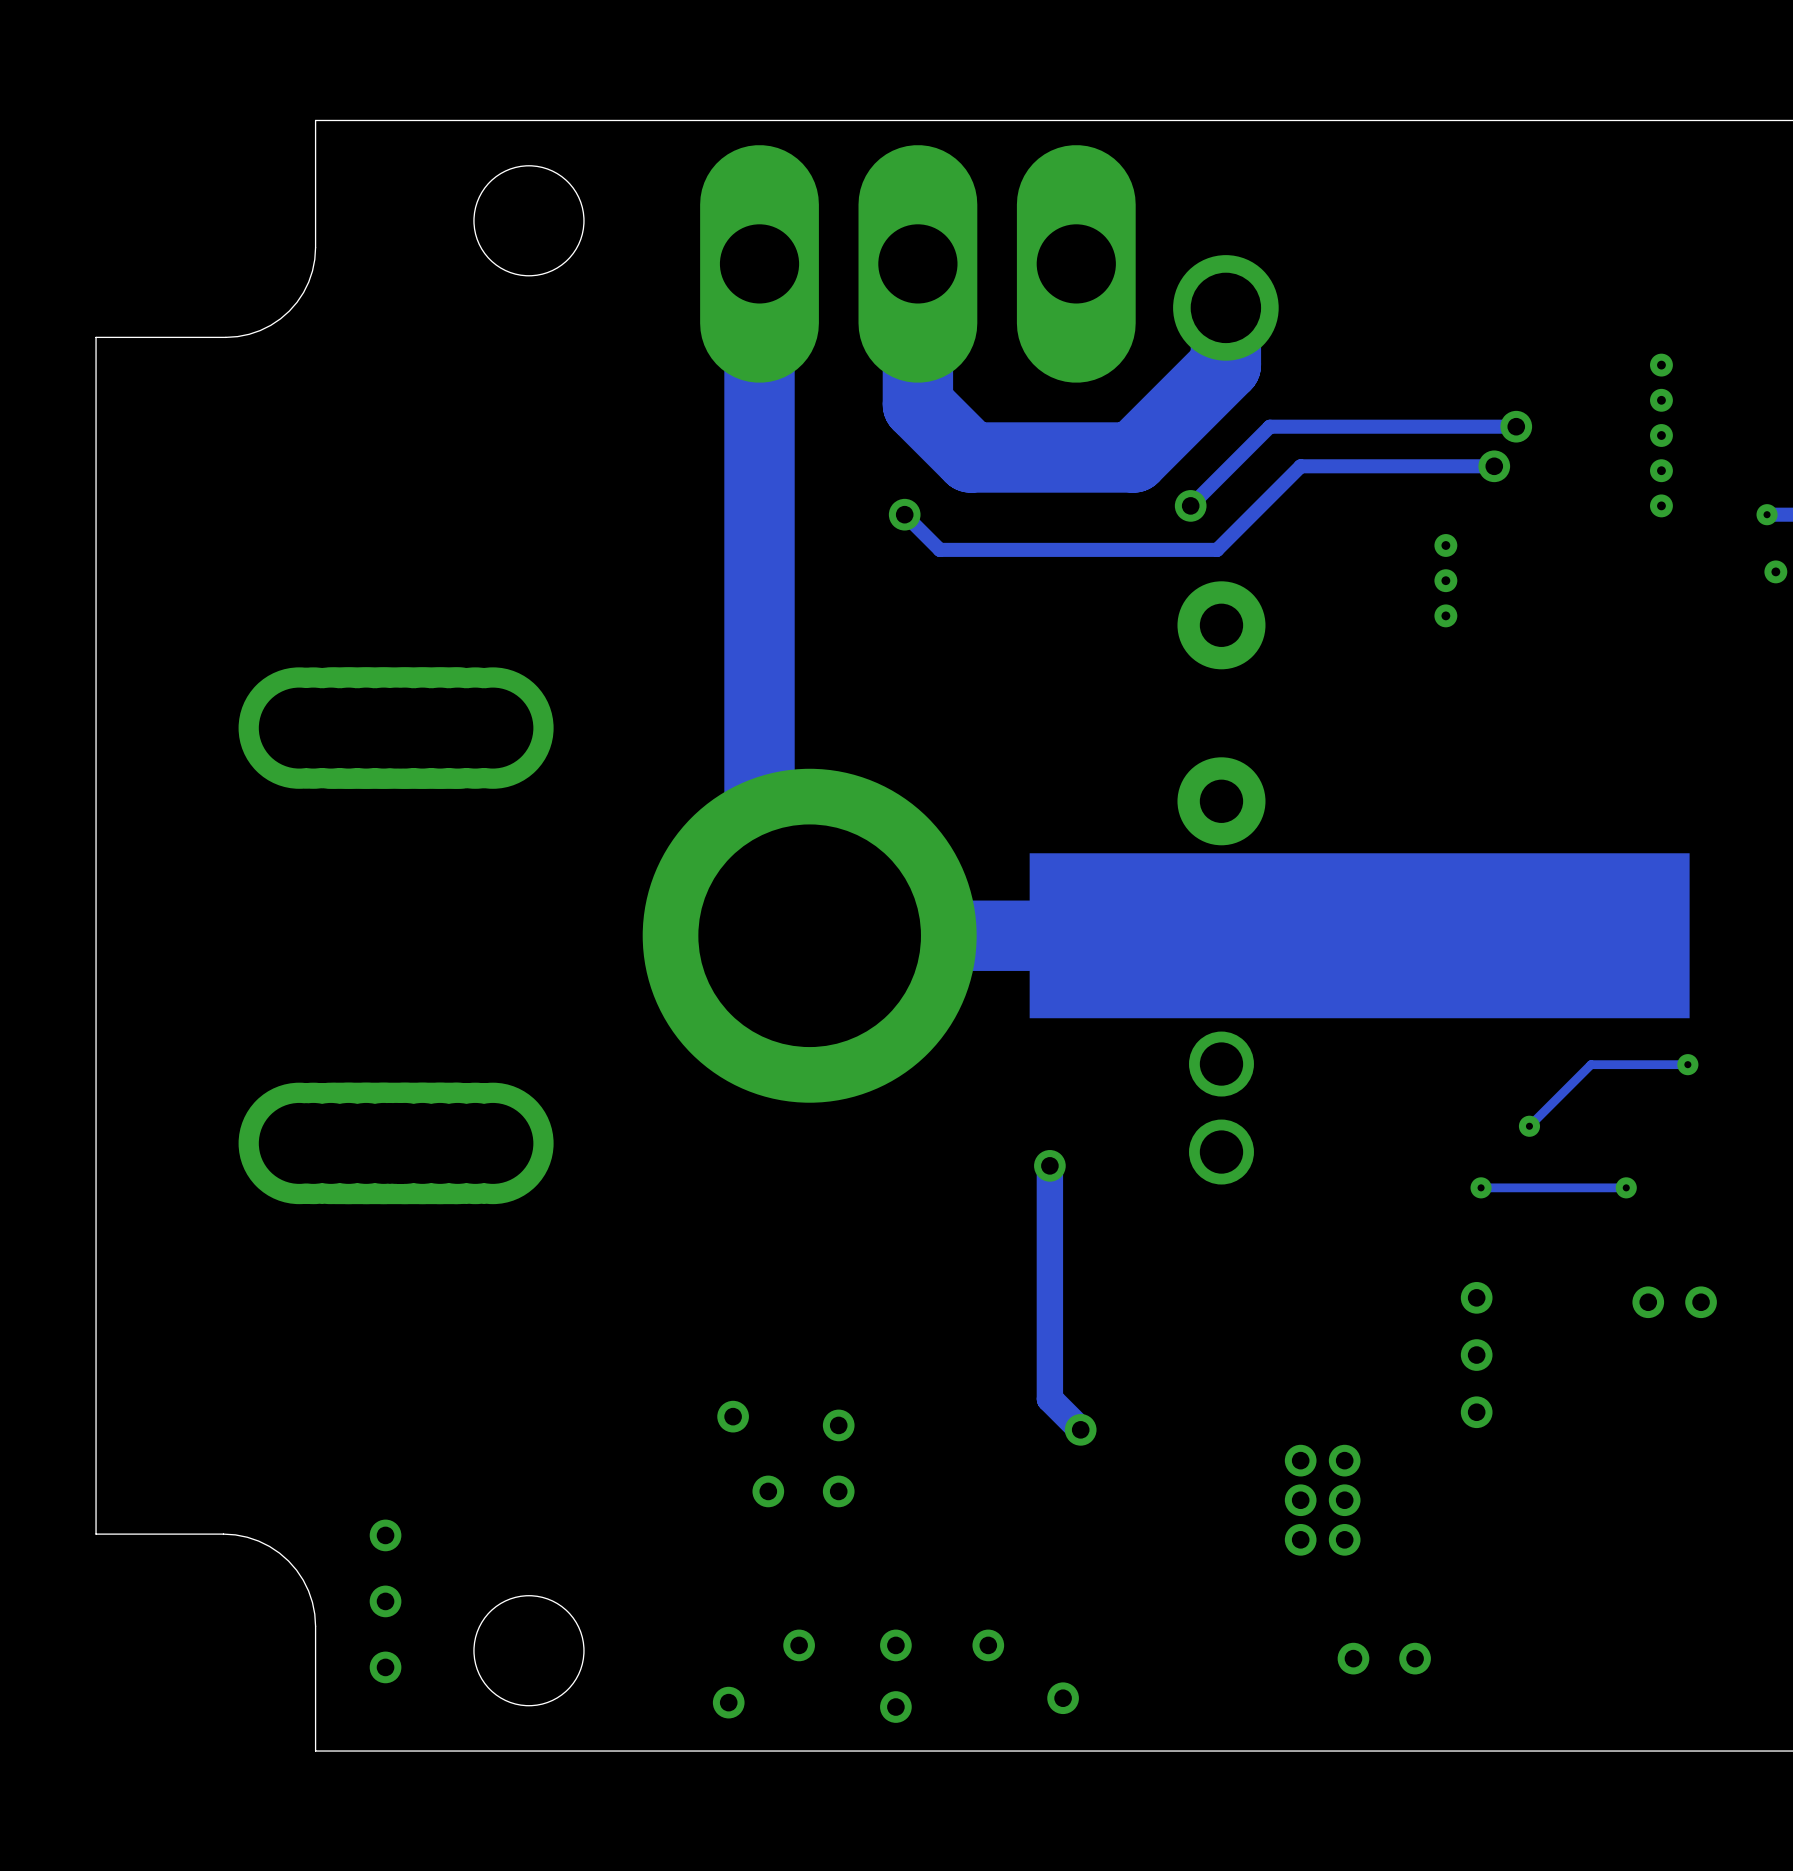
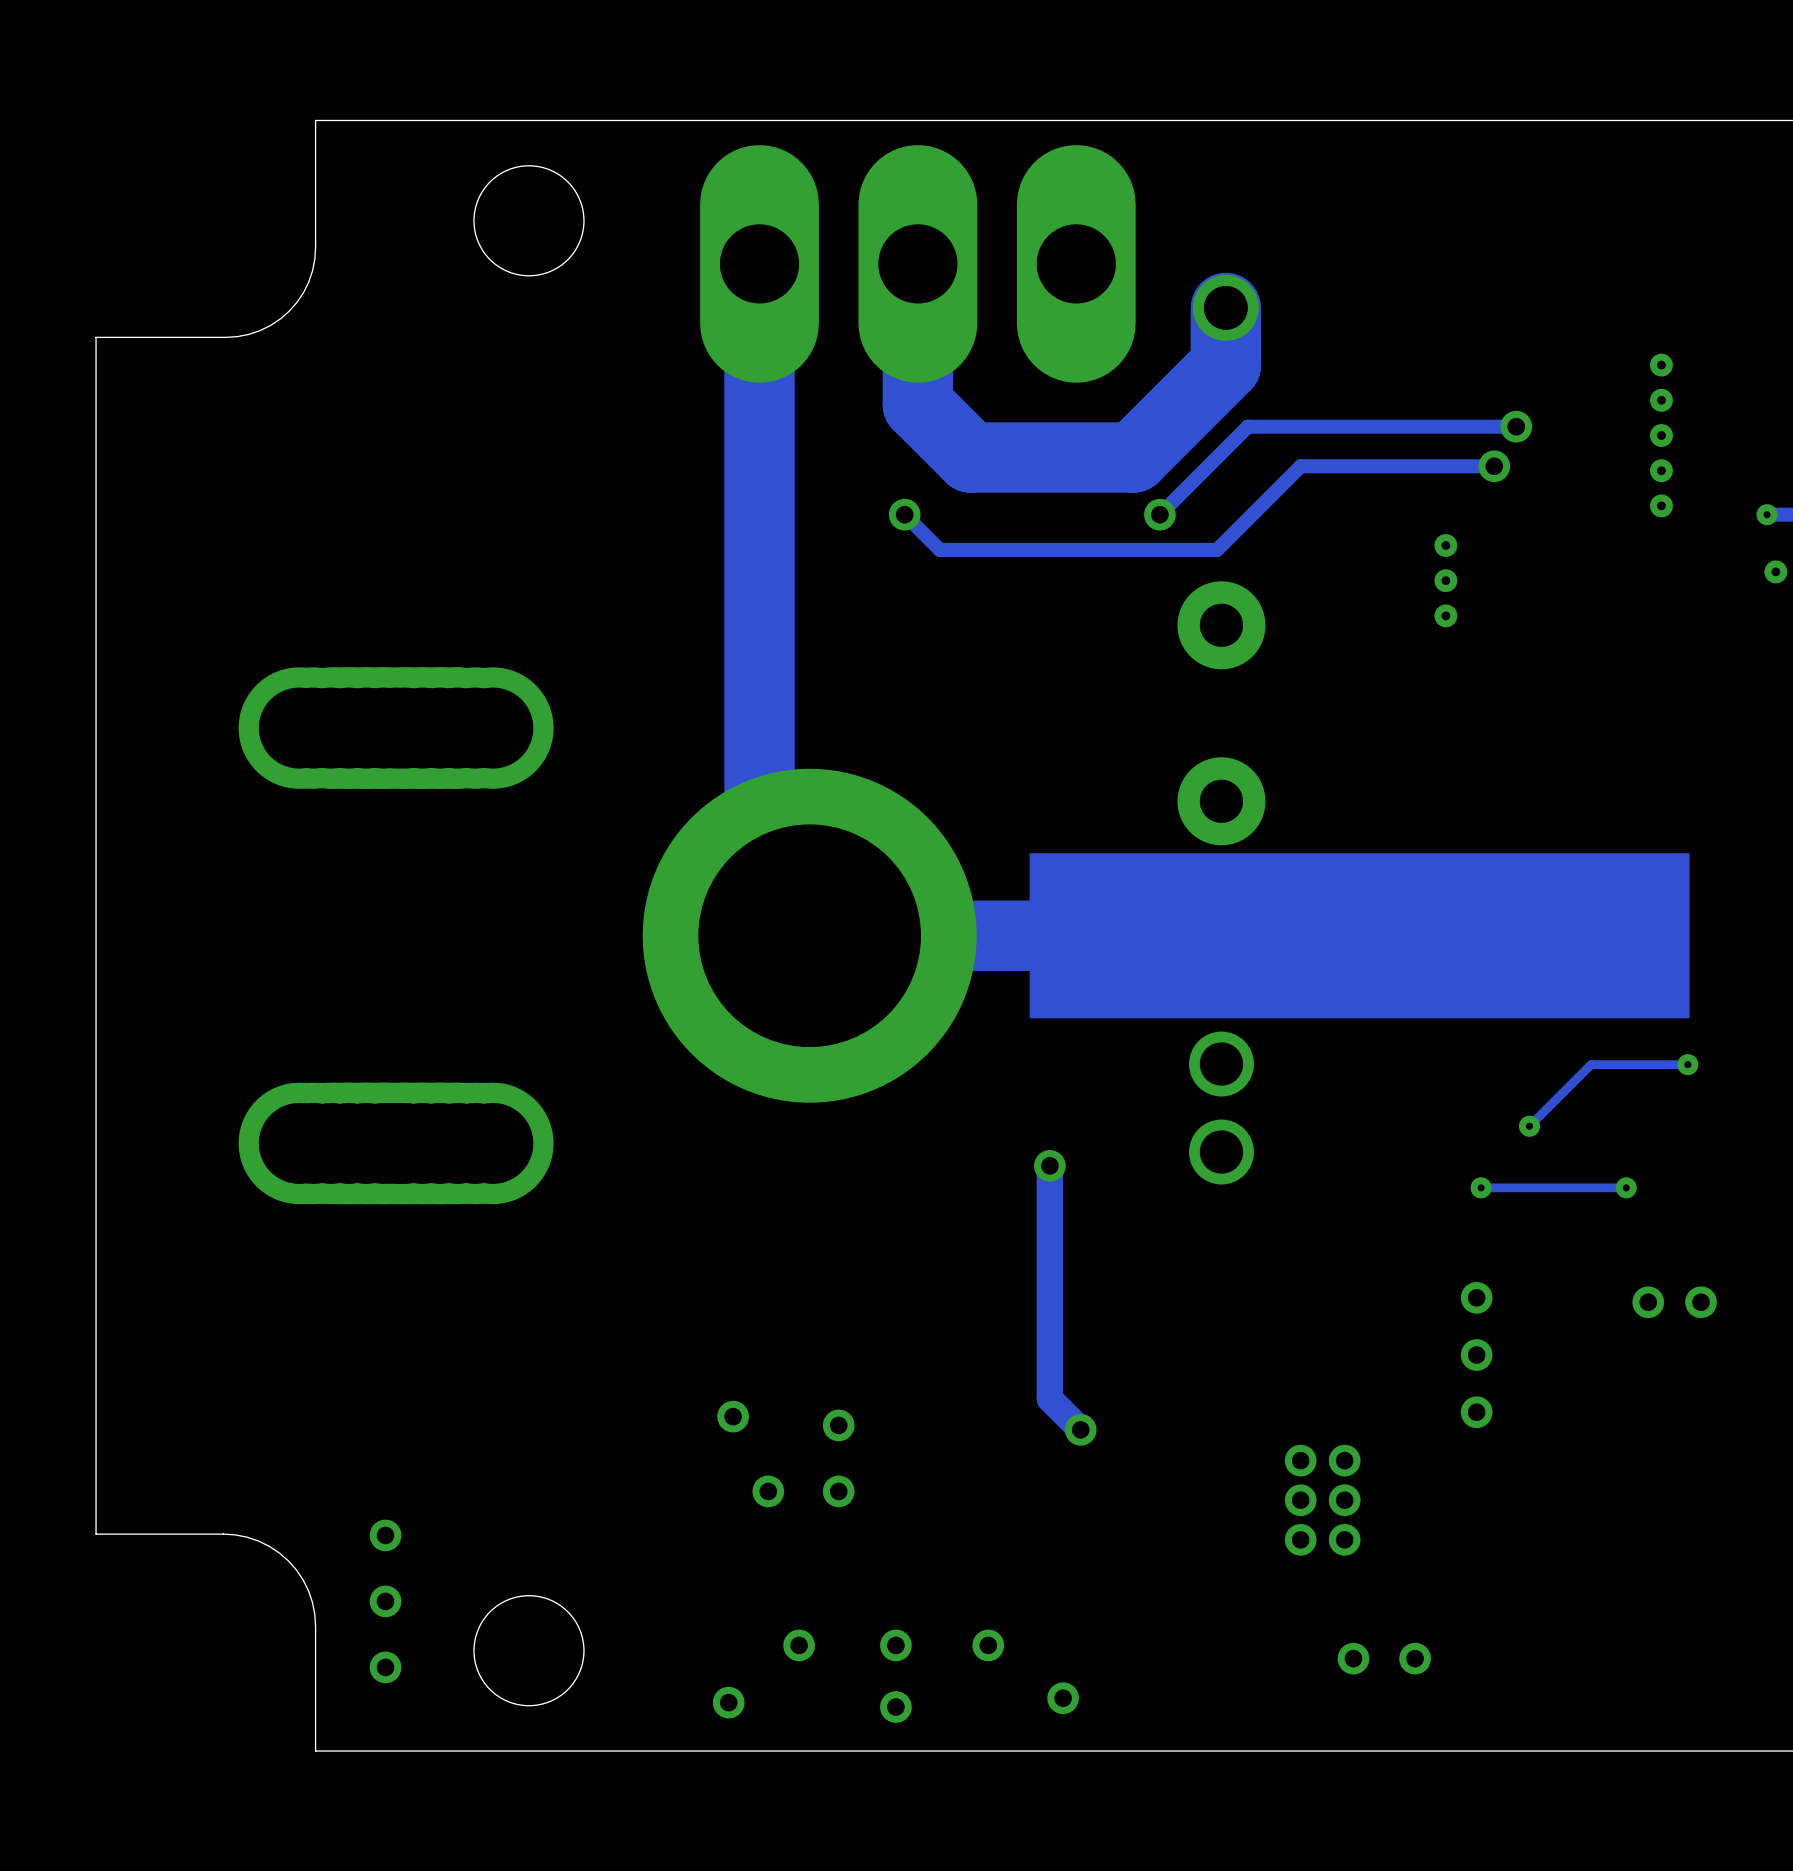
via size: [1173, 255, 1279, 361] -> [1192, 274, 1259, 341]
track: (1269, 426) (1190, 505) -> (1269, 426) (1247, 426) (1159, 514)
via position: (1190, 505) -> (1159, 514)

